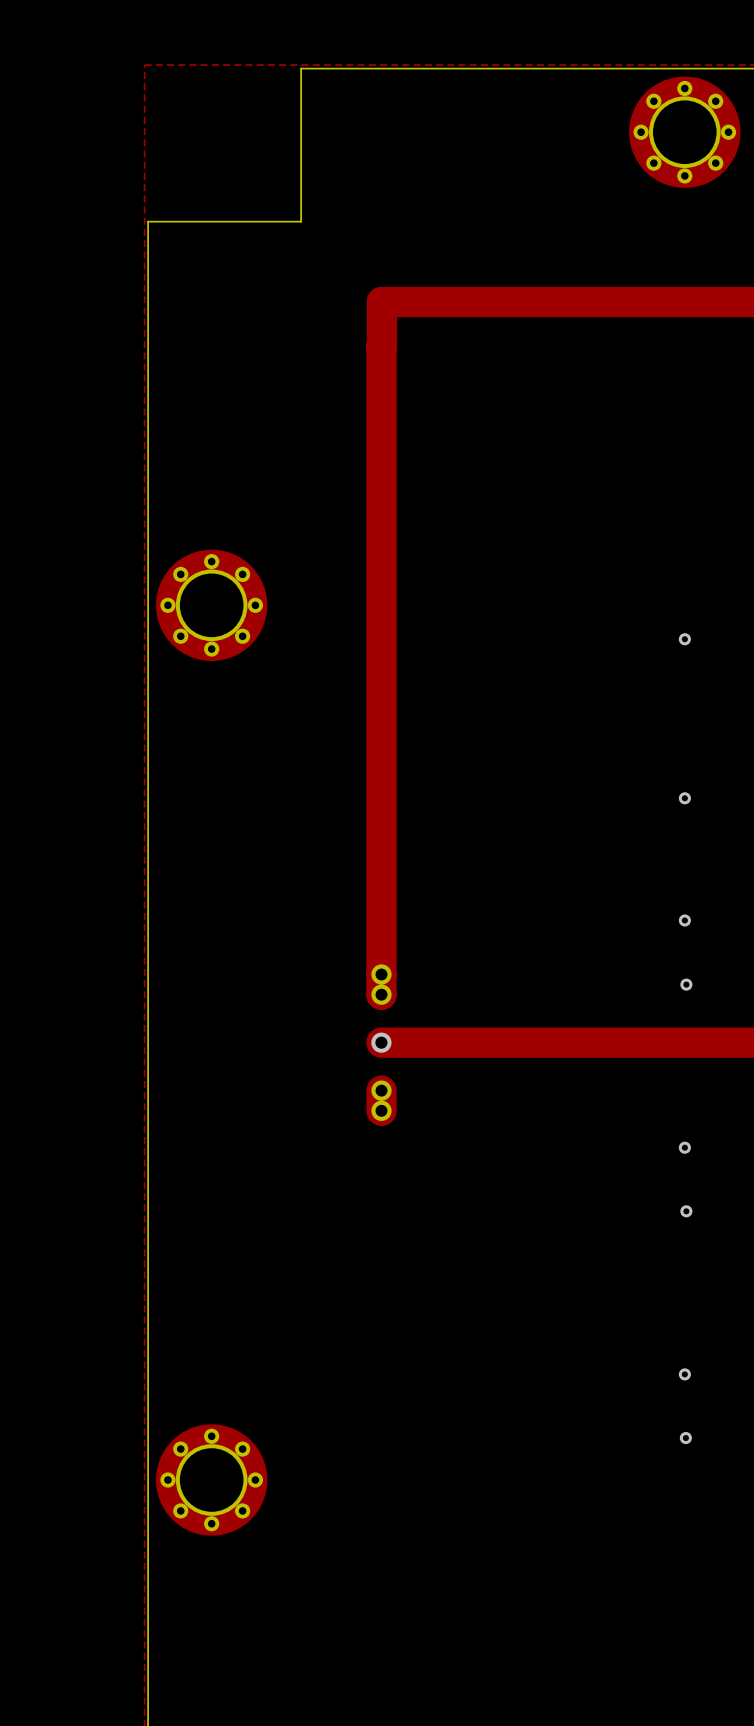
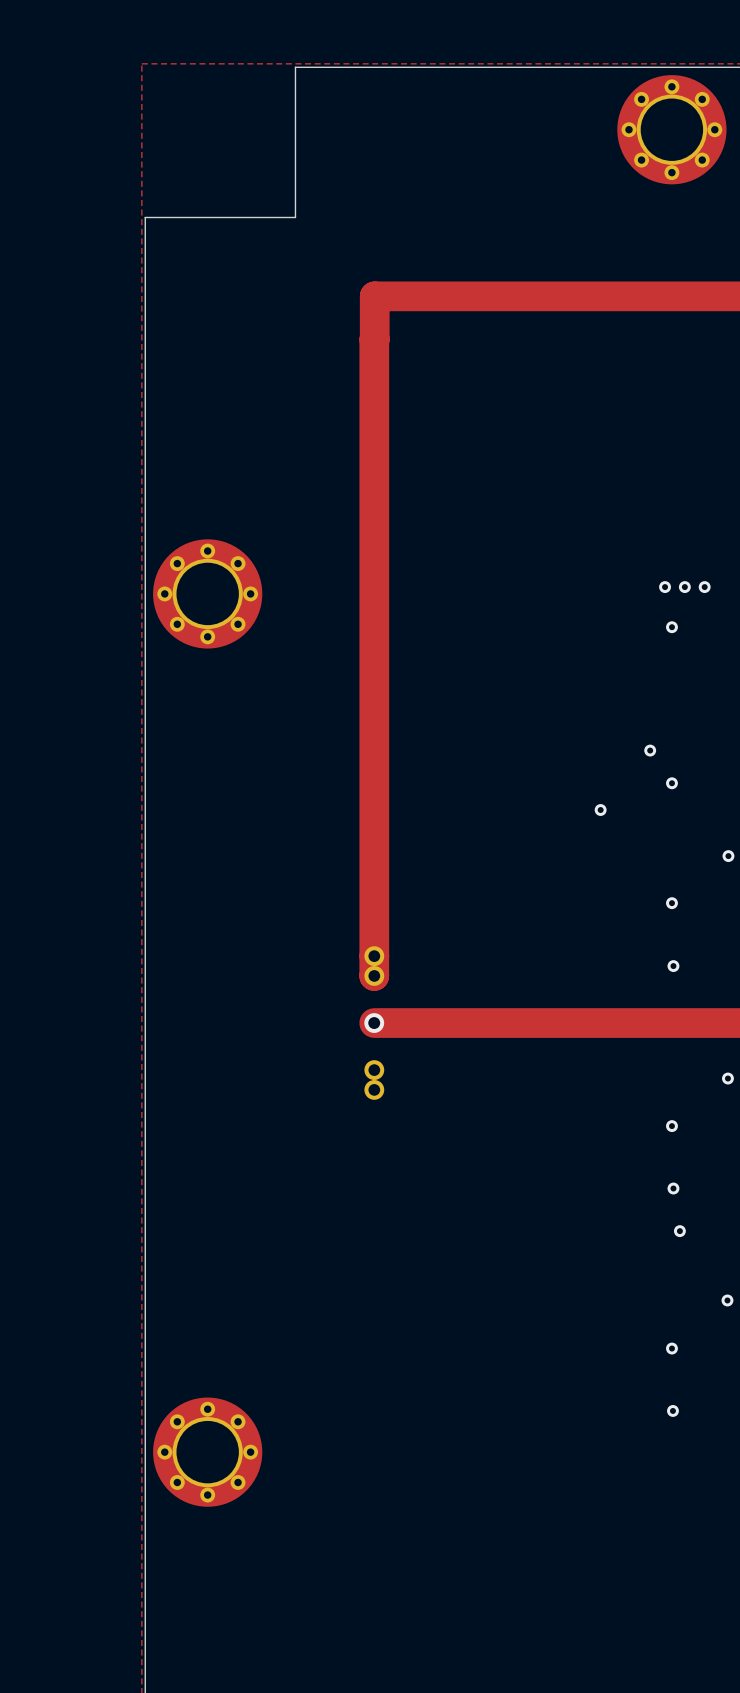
via: none -> (665, 587)
via: none -> (684, 587)
via: none -> (704, 587)
via: none -> (650, 750)
via: none -> (600, 810)
via: none -> (728, 856)
track: (381, 1090) (381, 1110) -> none
via: none -> (727, 1078)
via: none -> (679, 1231)
via: none -> (727, 1300)

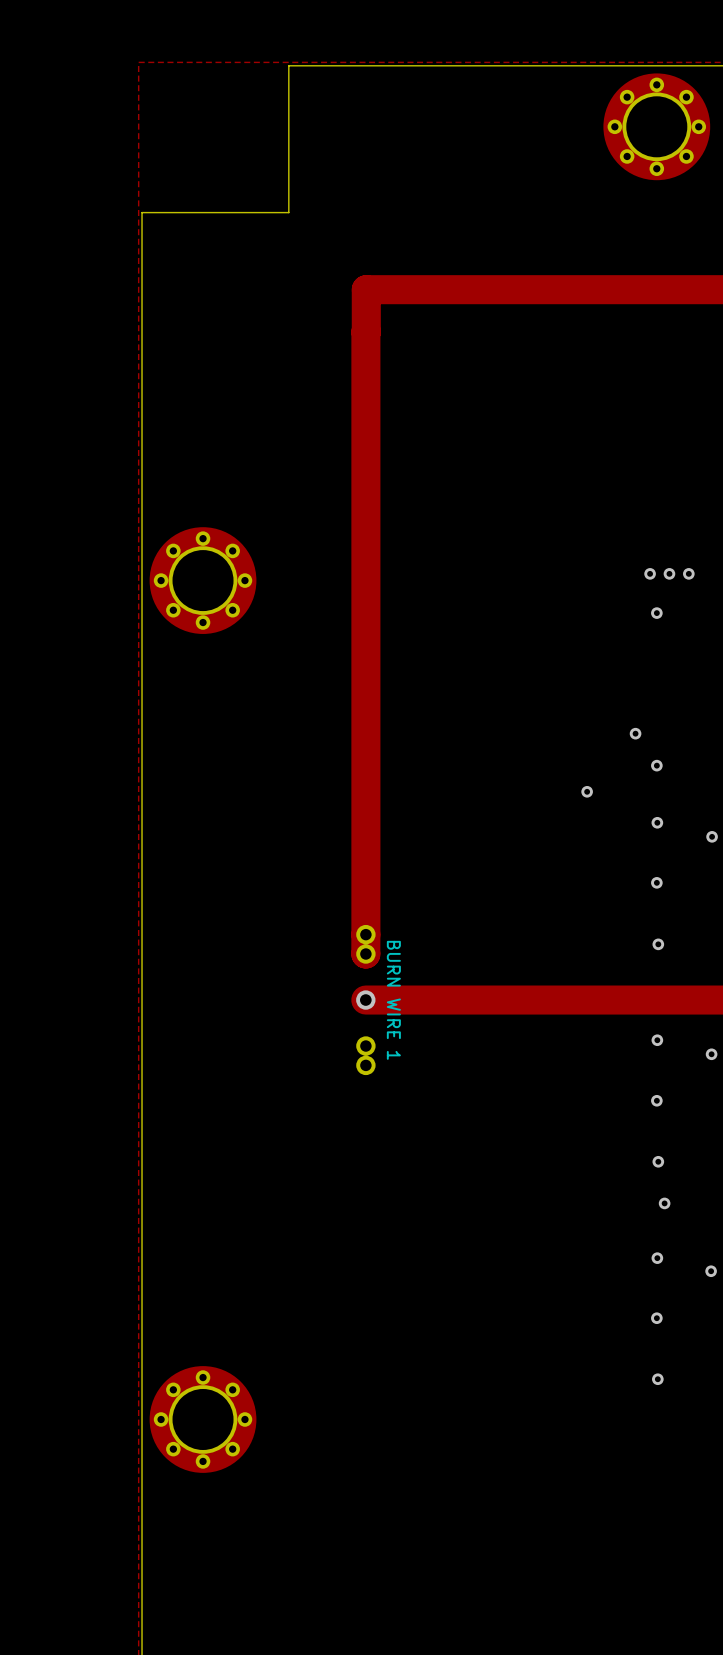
via: none -> (657, 822)
text: none -> BURN WIRE 1 (393, 1000)
via: none -> (657, 1040)
via: none -> (657, 1258)

